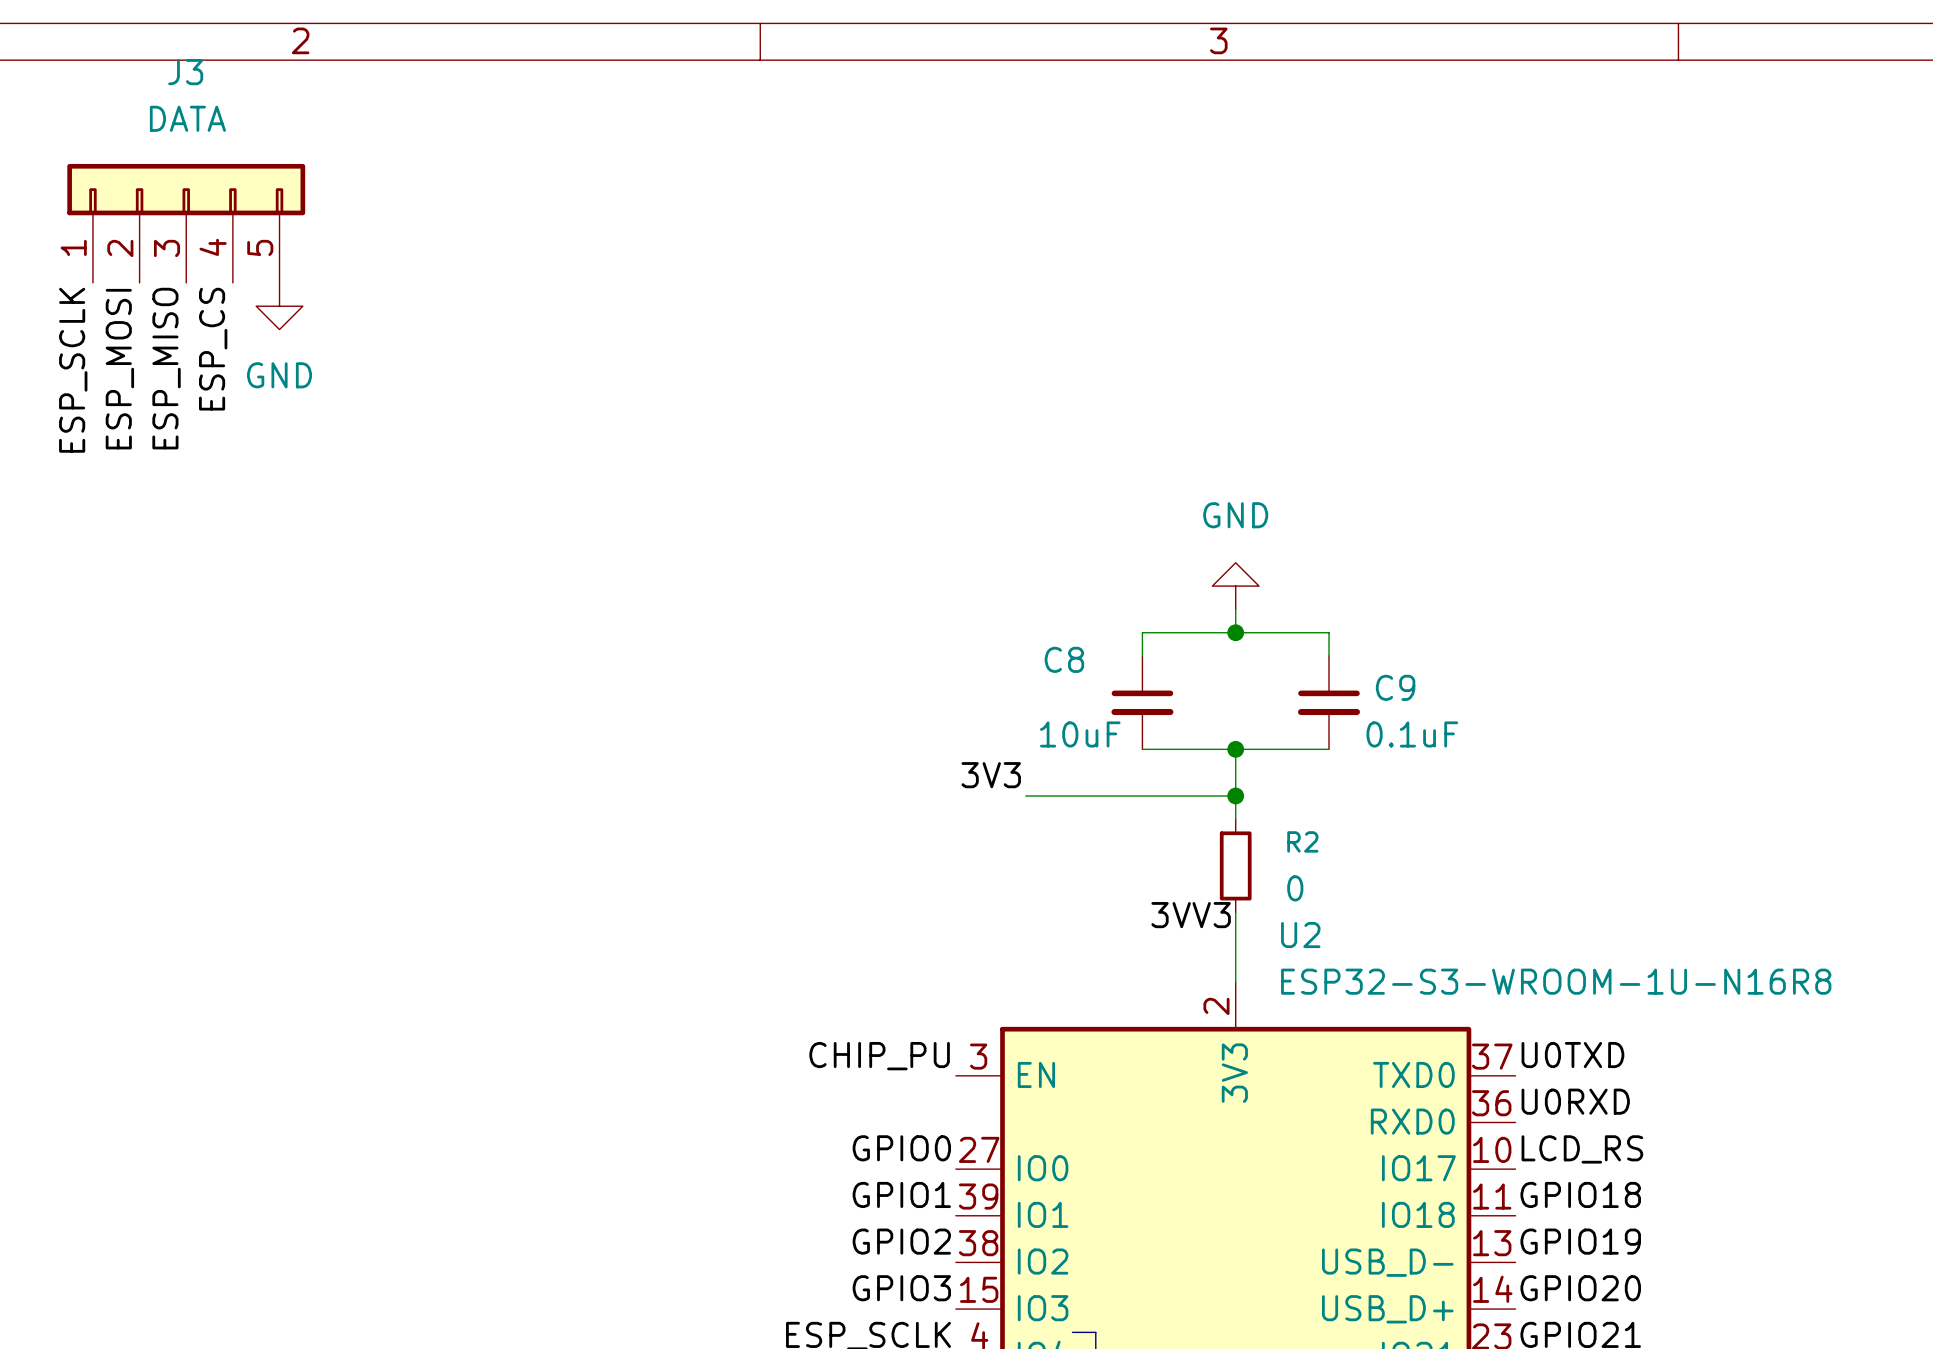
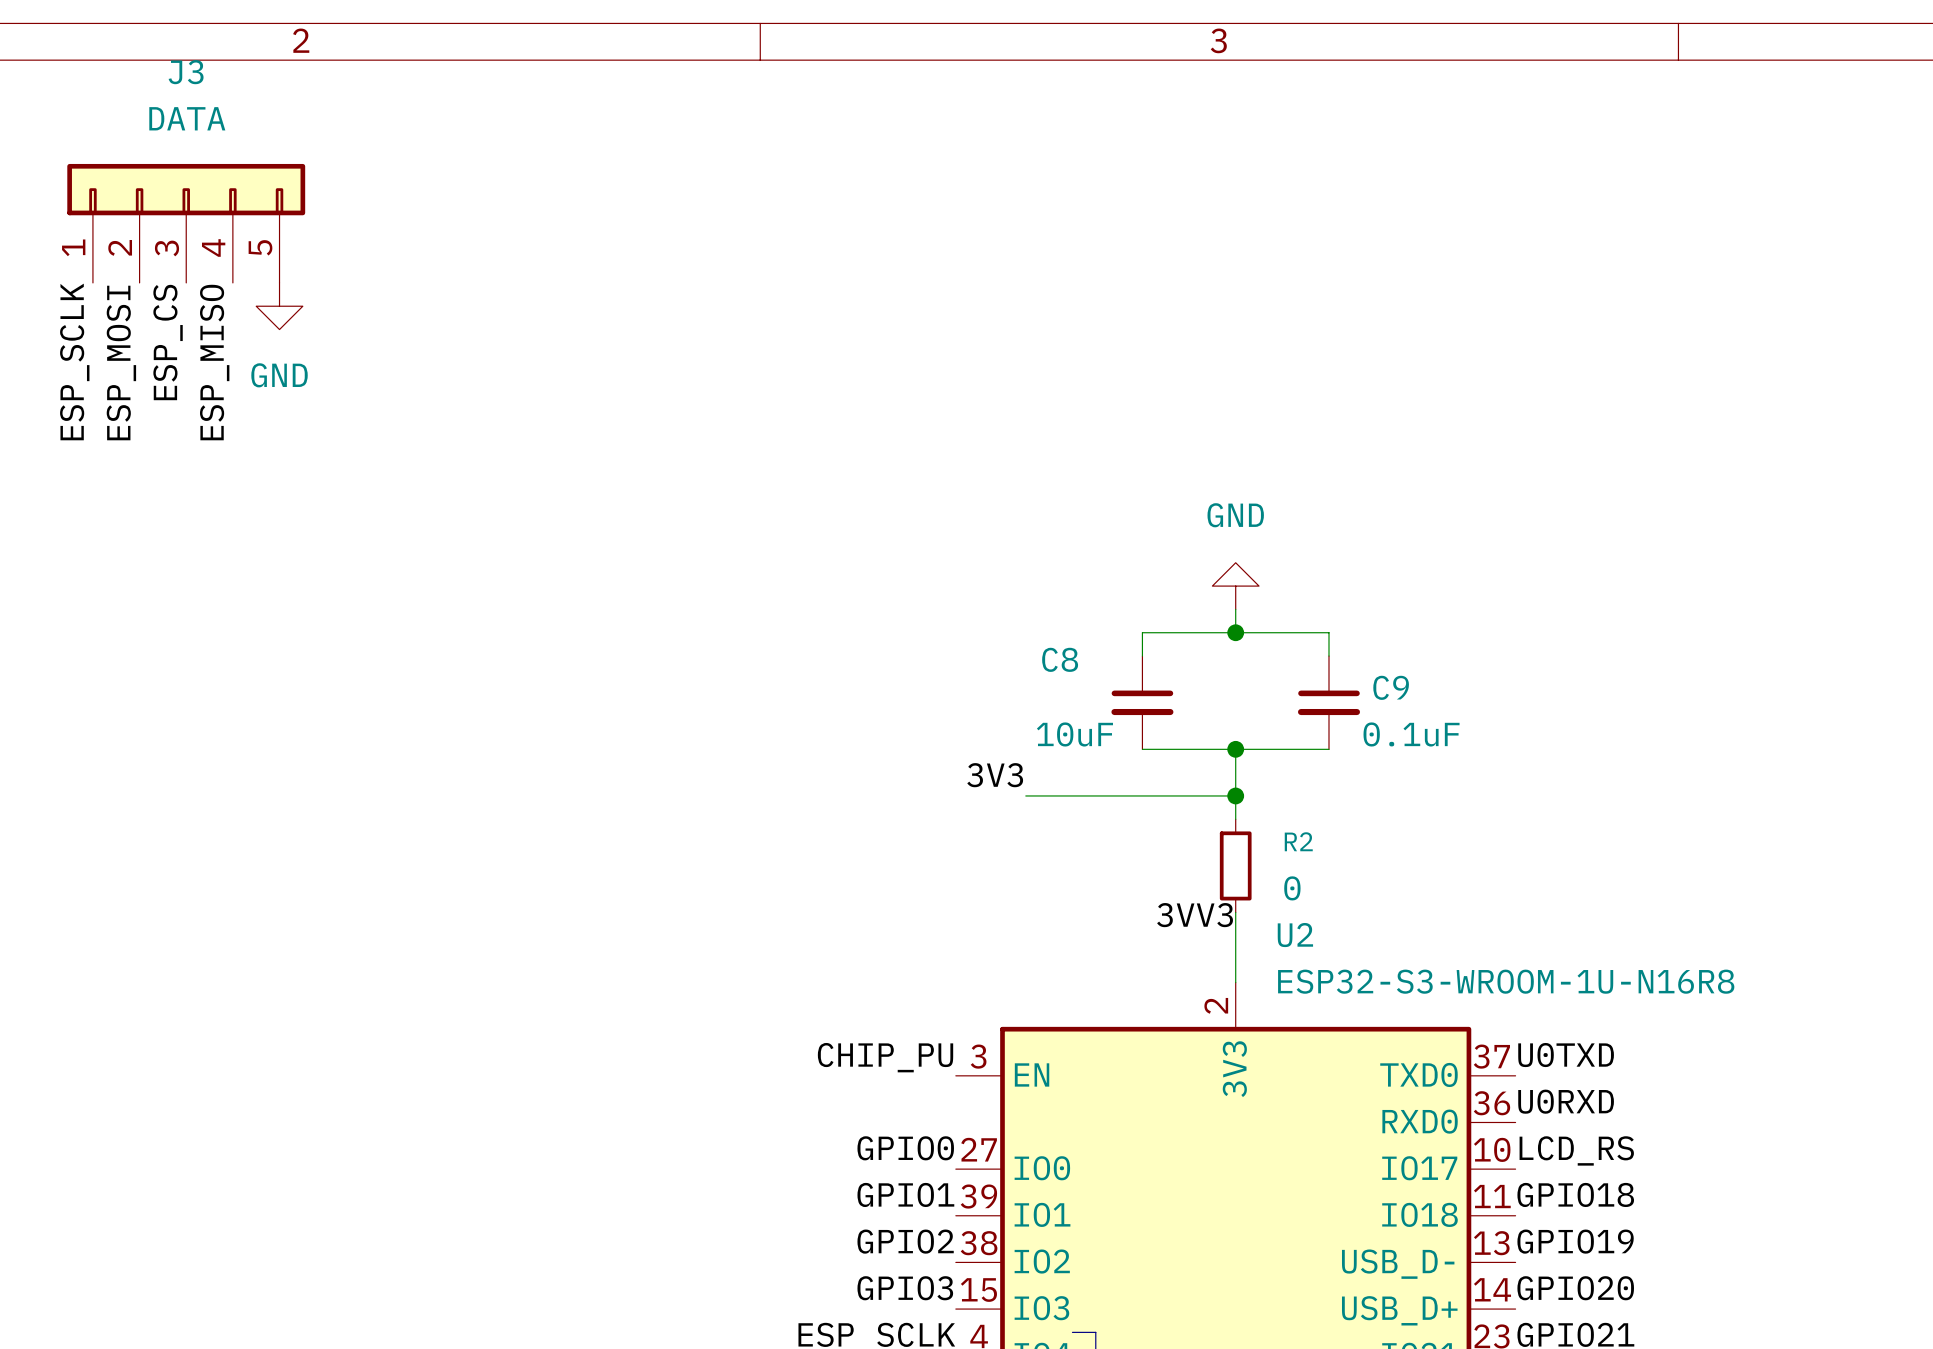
label: ESP_CS (213, 349) -> ESP_MISO (214, 362)
label: ESP_MISO (166, 368) -> ESP_CS (168, 342)

